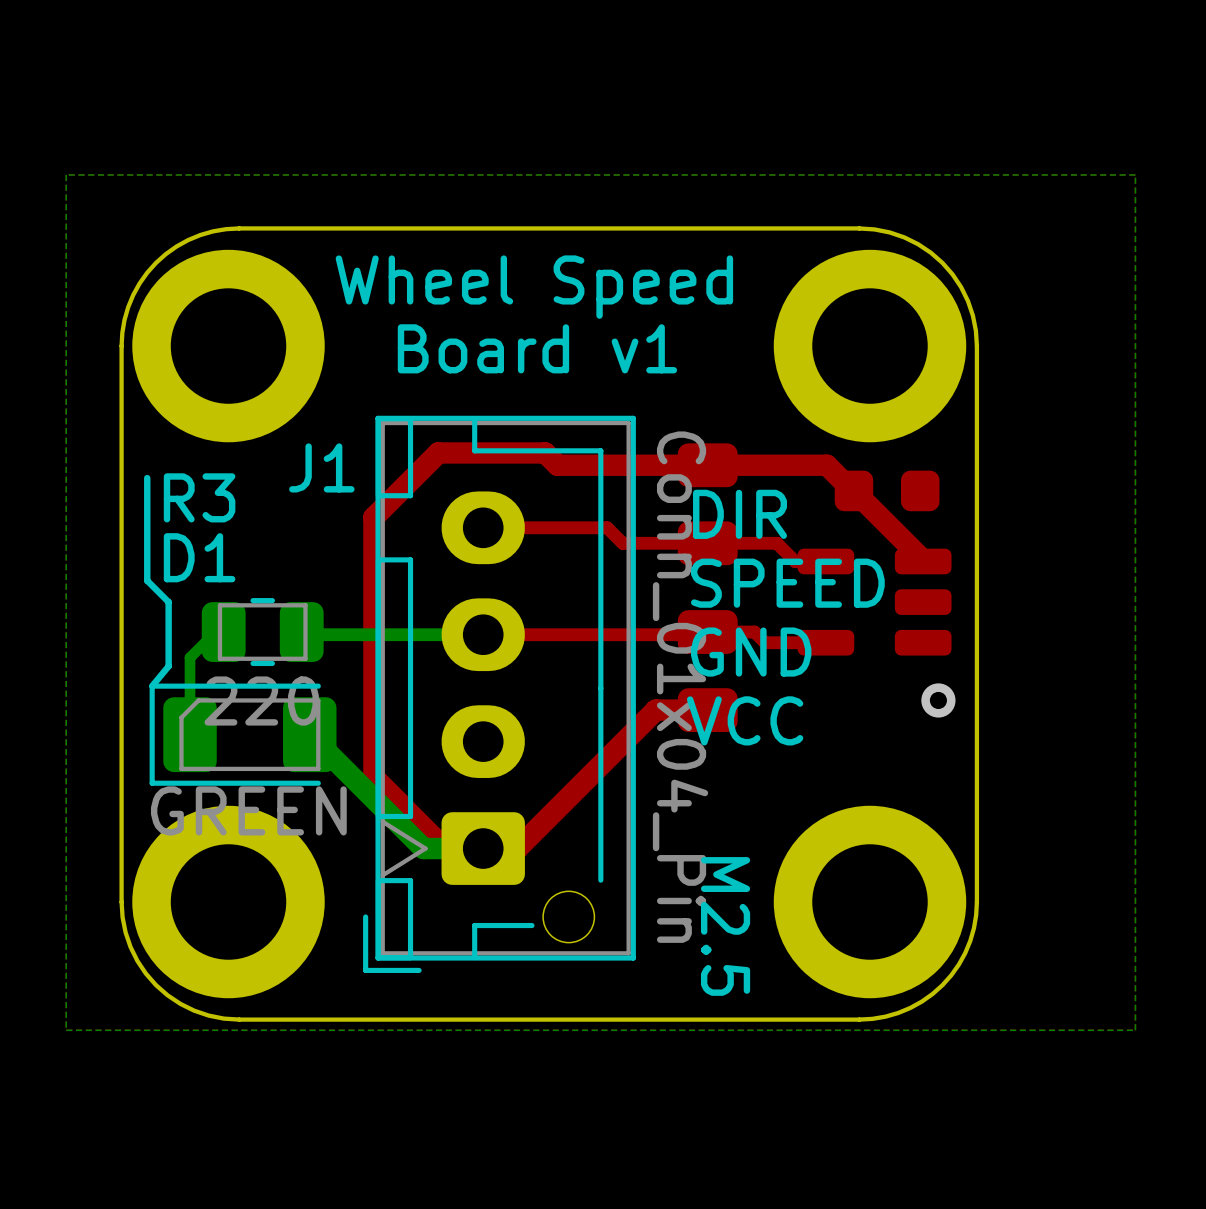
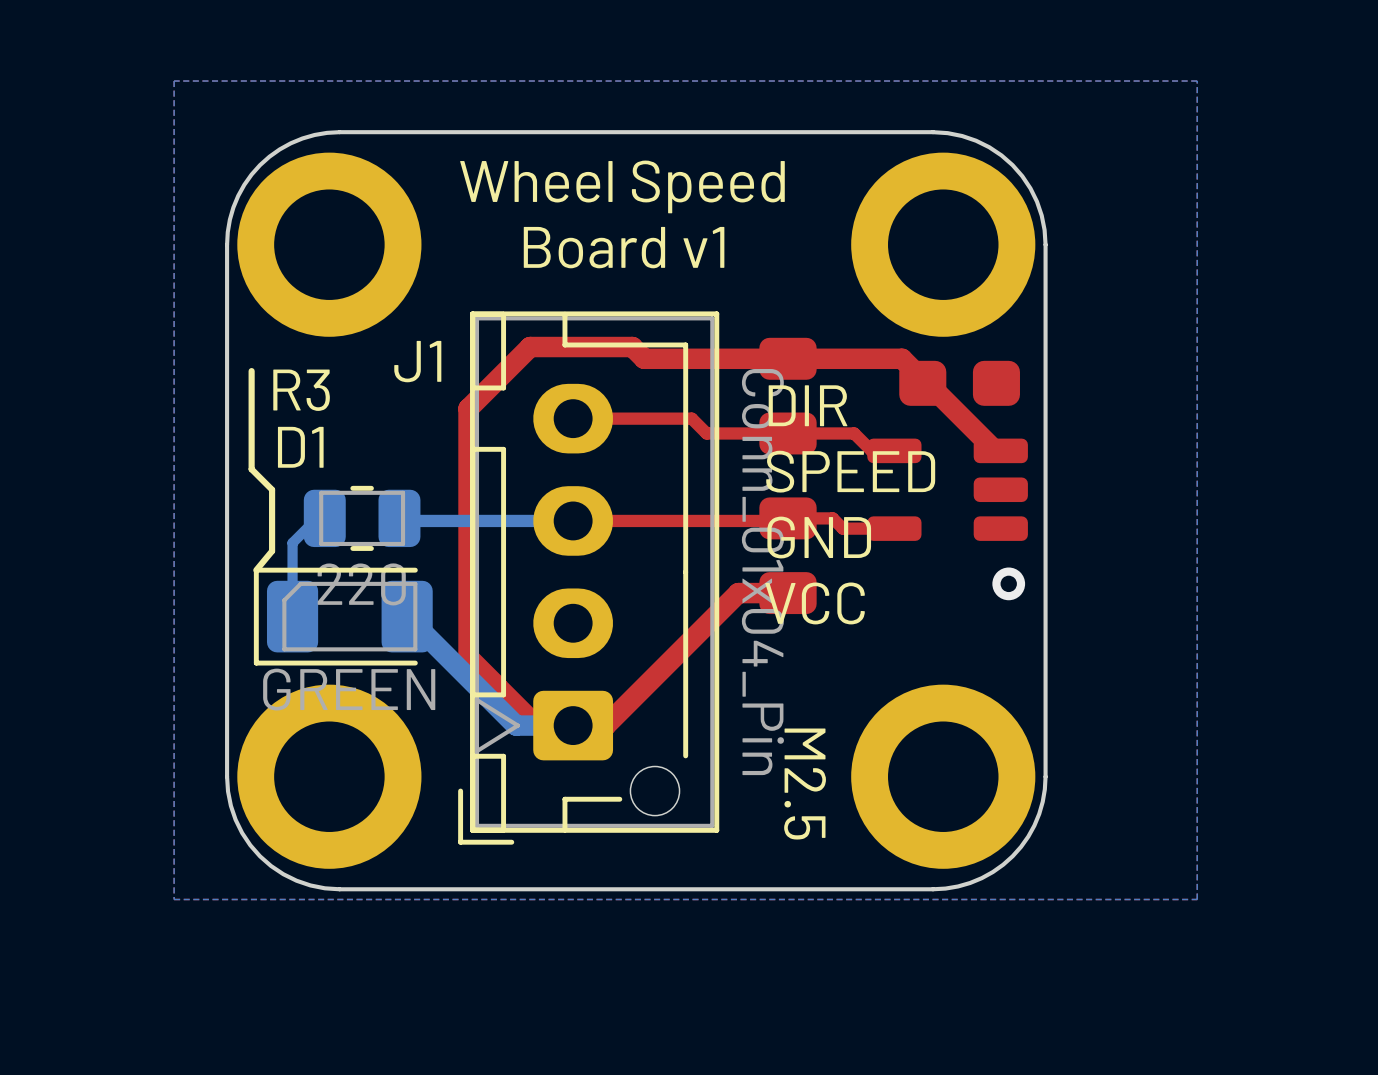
part footprint: [834, 470, 940, 512] -> [899, 360, 1020, 406]
part footprint: [797, 548, 952, 656] -> [867, 438, 1028, 541]

